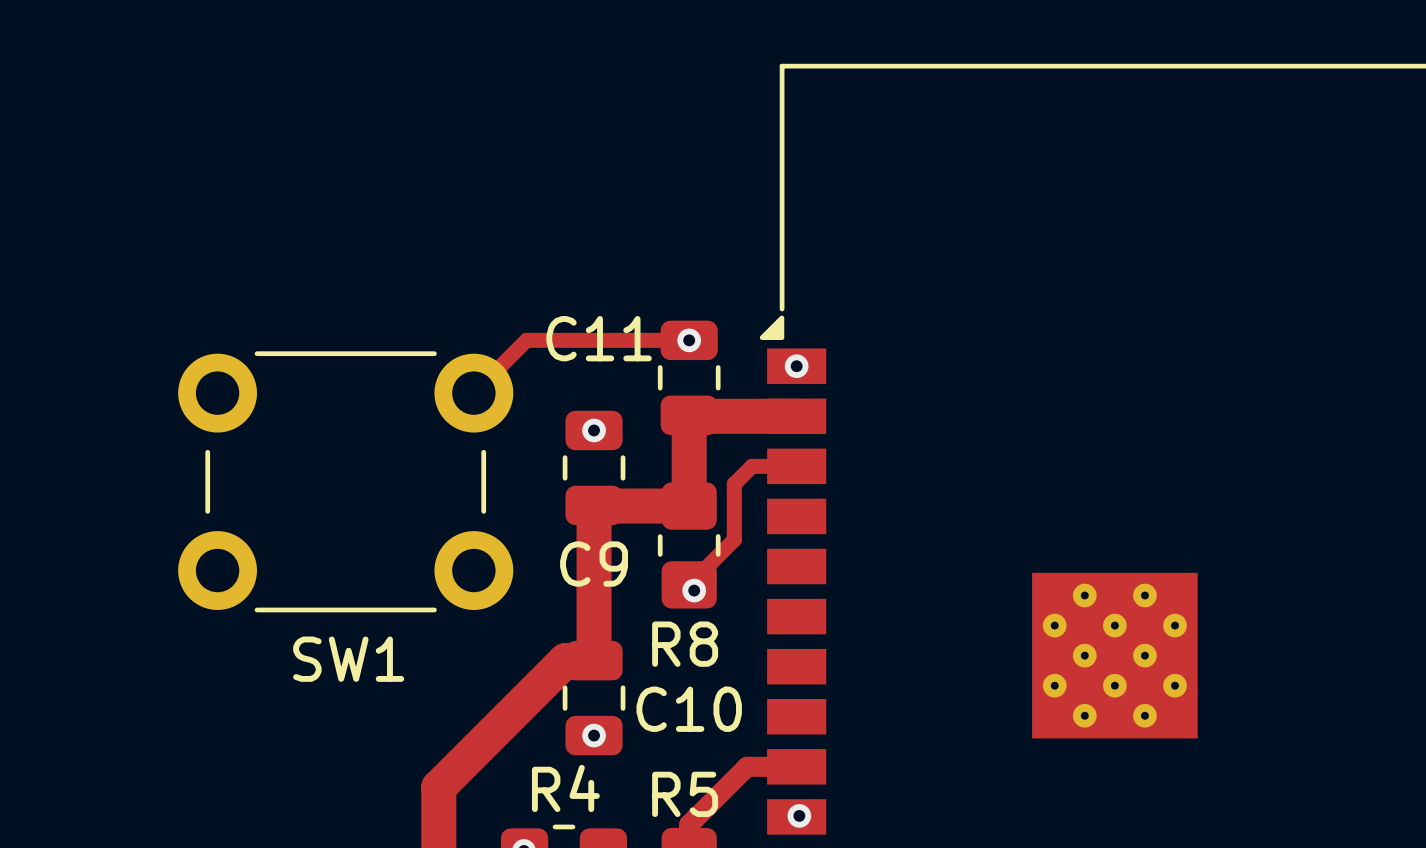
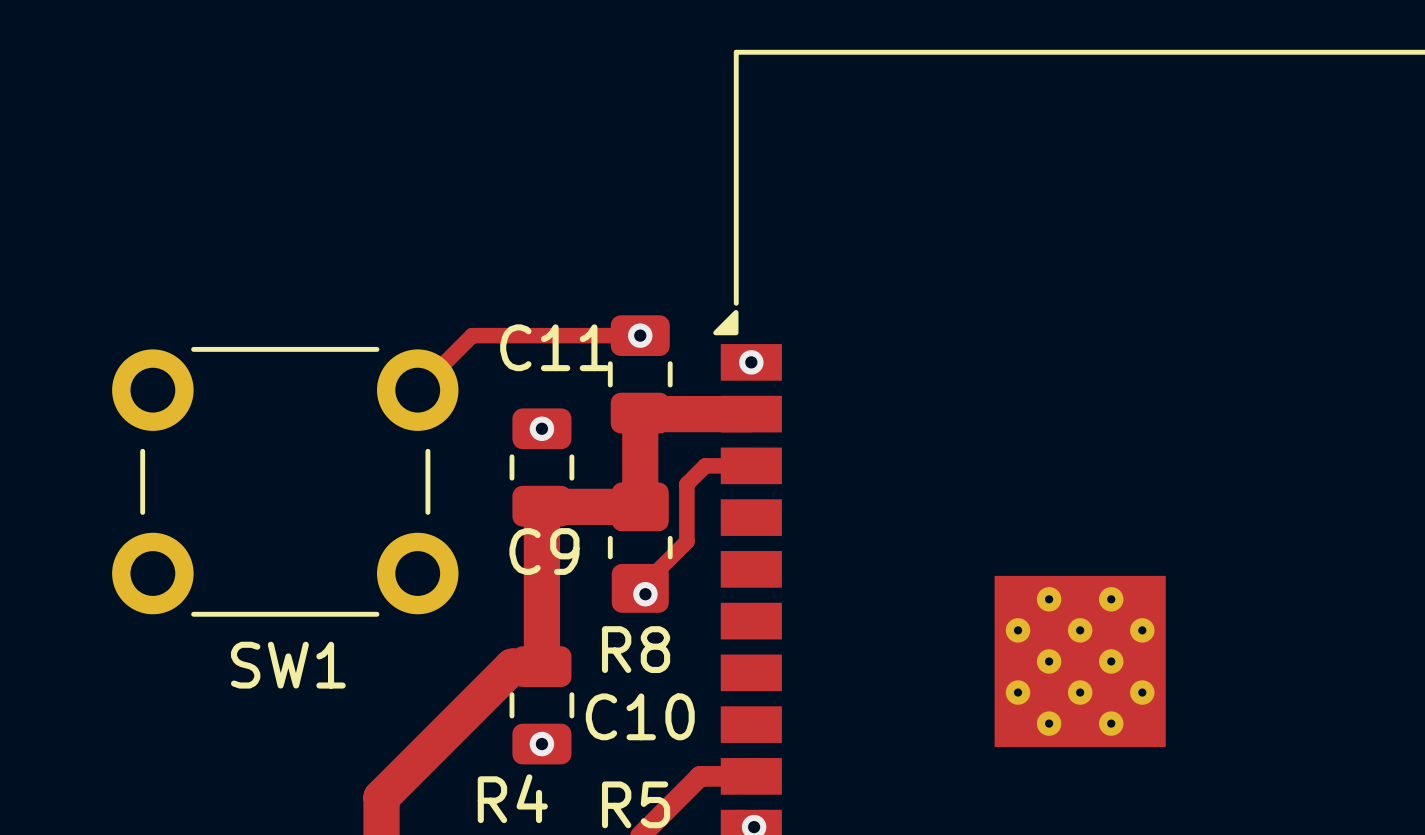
C11 name position: C11 (599, 338) -> C11 (554, 347)
C9 name position: C9 (594, 564) -> C9 (544, 551)

